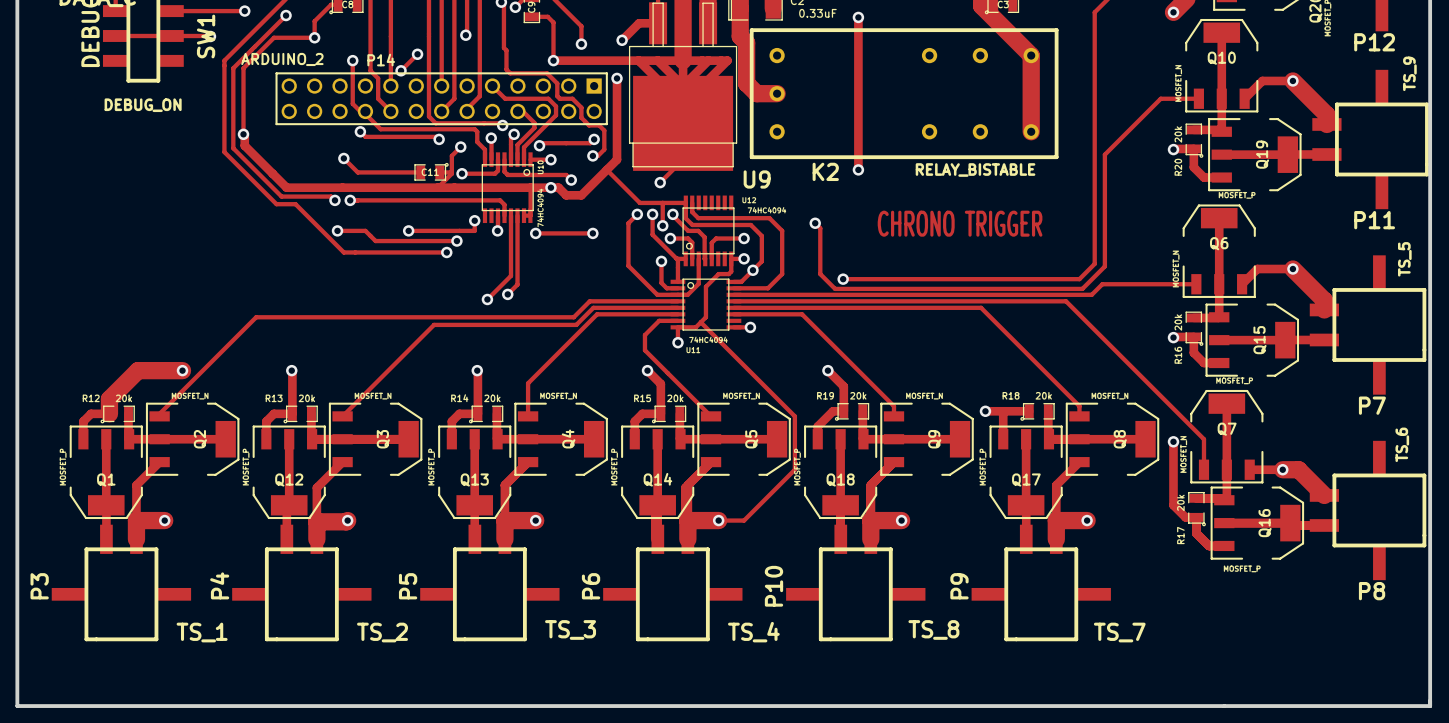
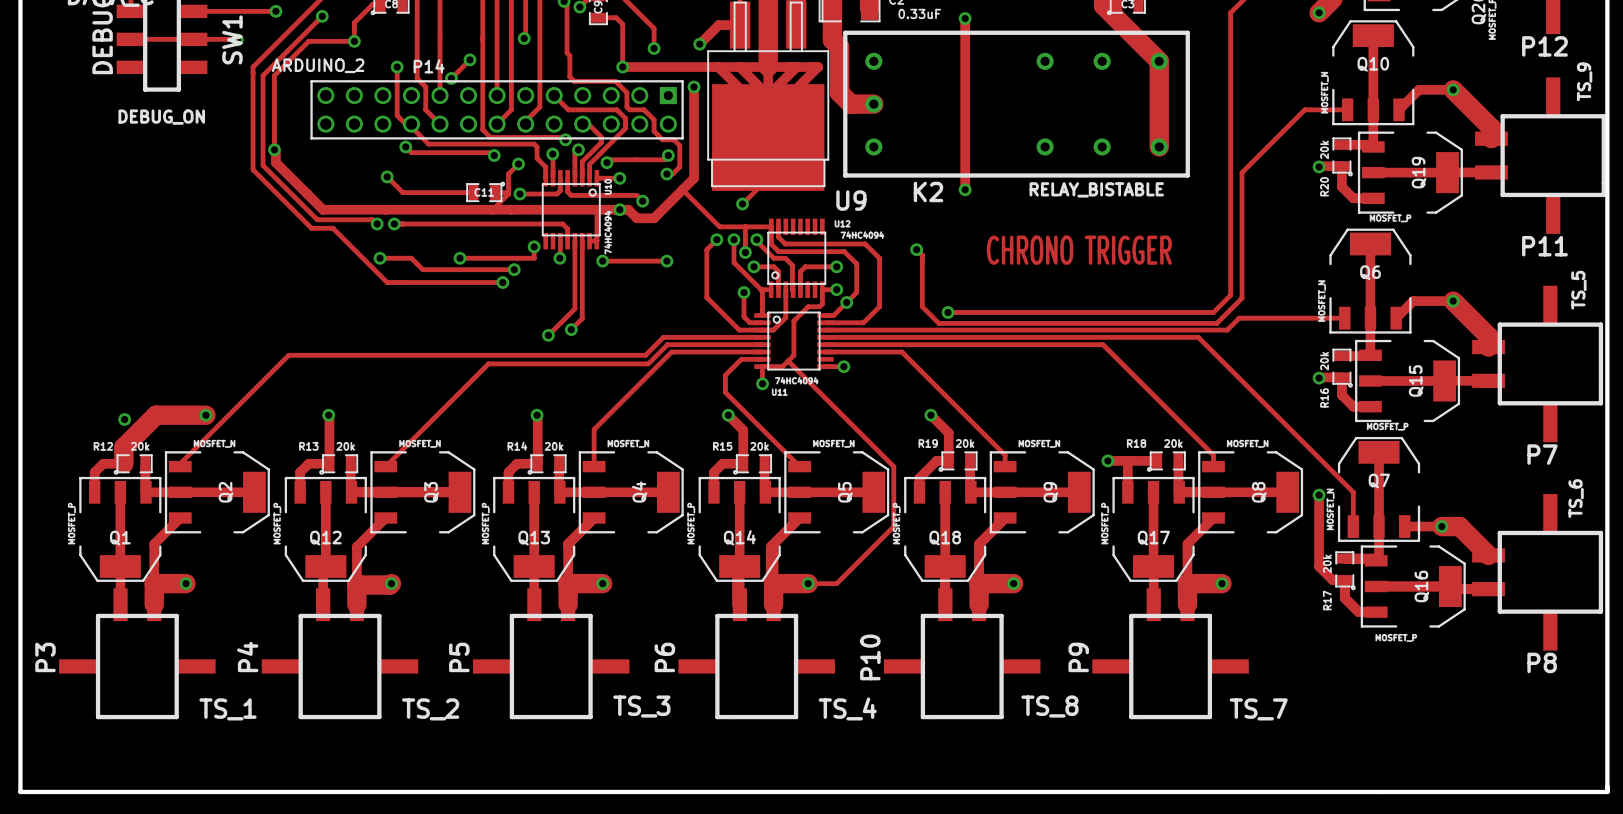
via: none -> (124, 419)

